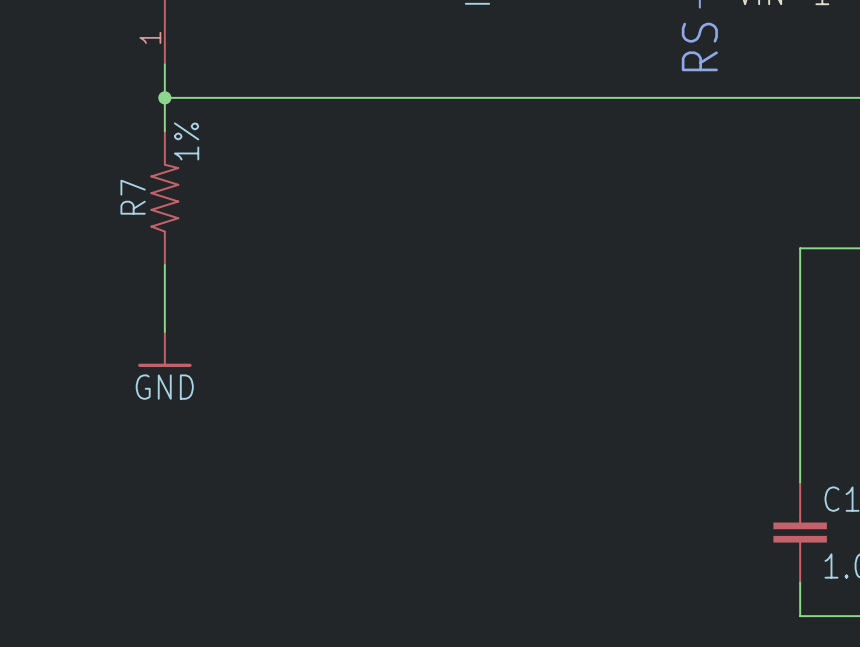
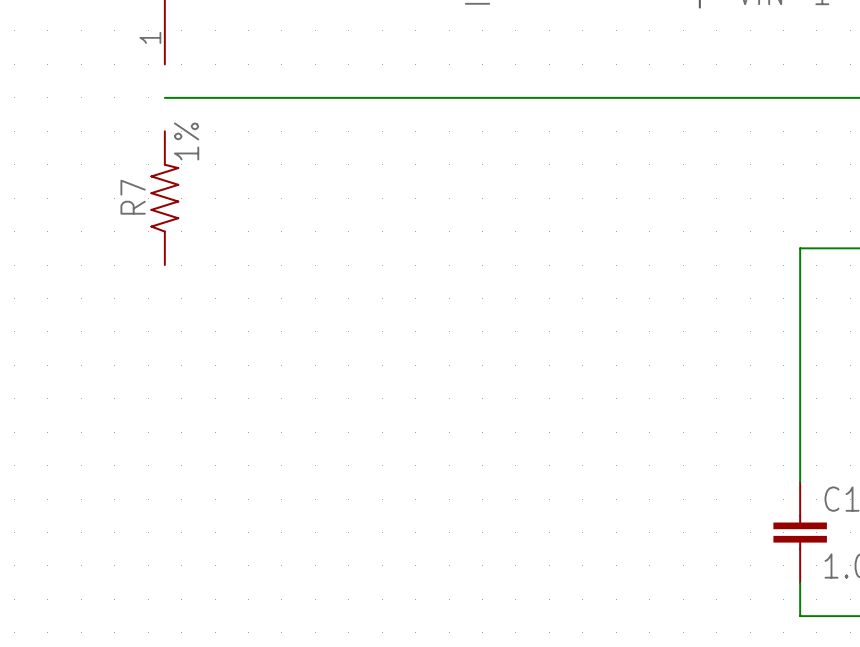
text: RS (699, 46) -> none
wire: (164, 64) (164, 131) -> none
junction: (164, 97) -> none
wire: (164, 265) (164, 331) -> none
power symbol: GND (164, 349) -> none

